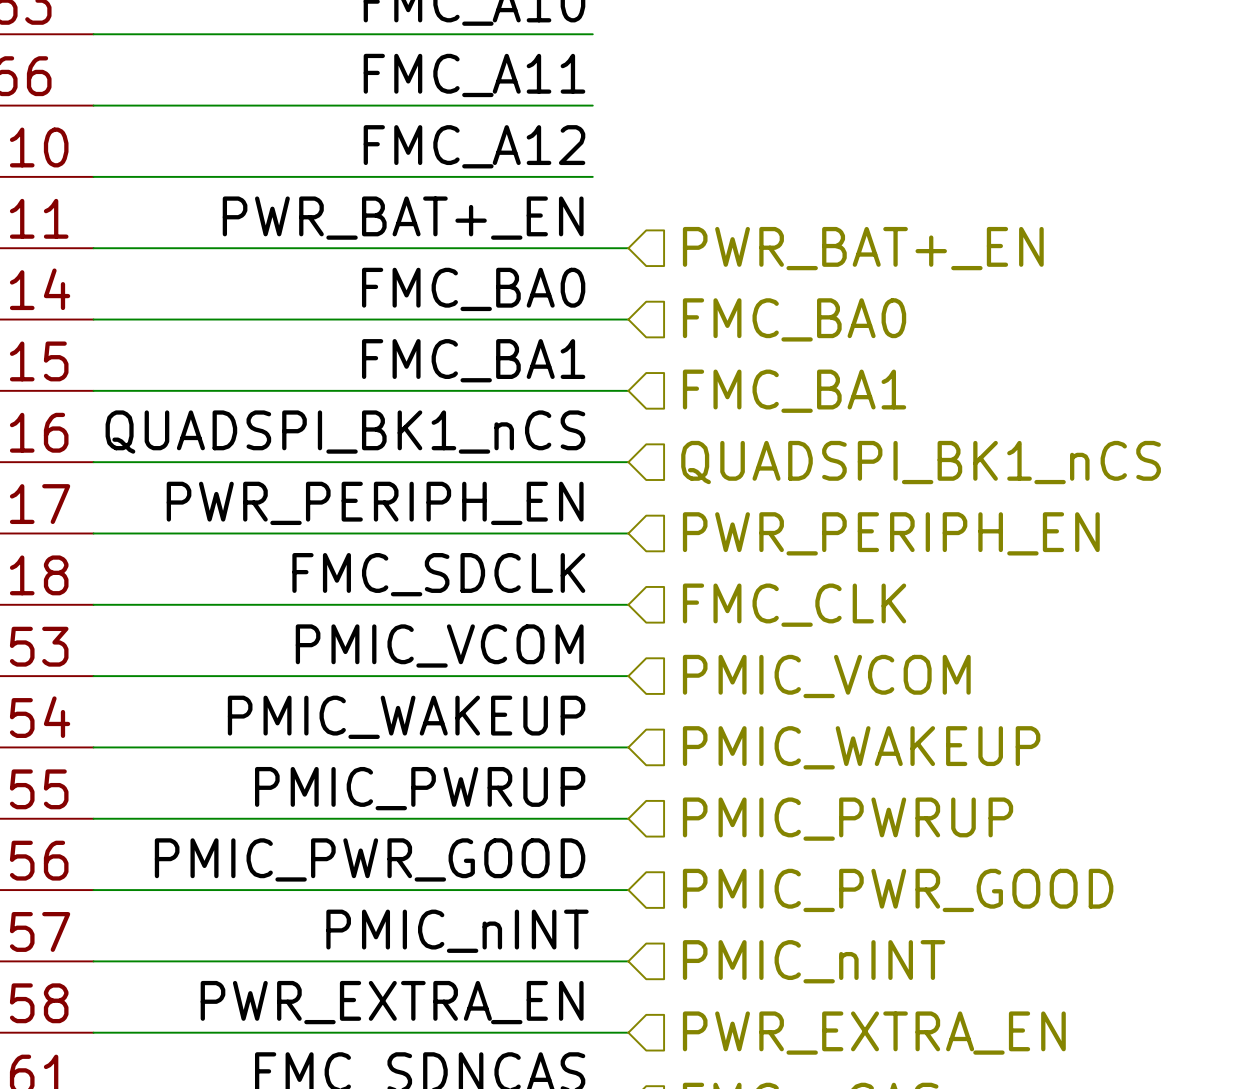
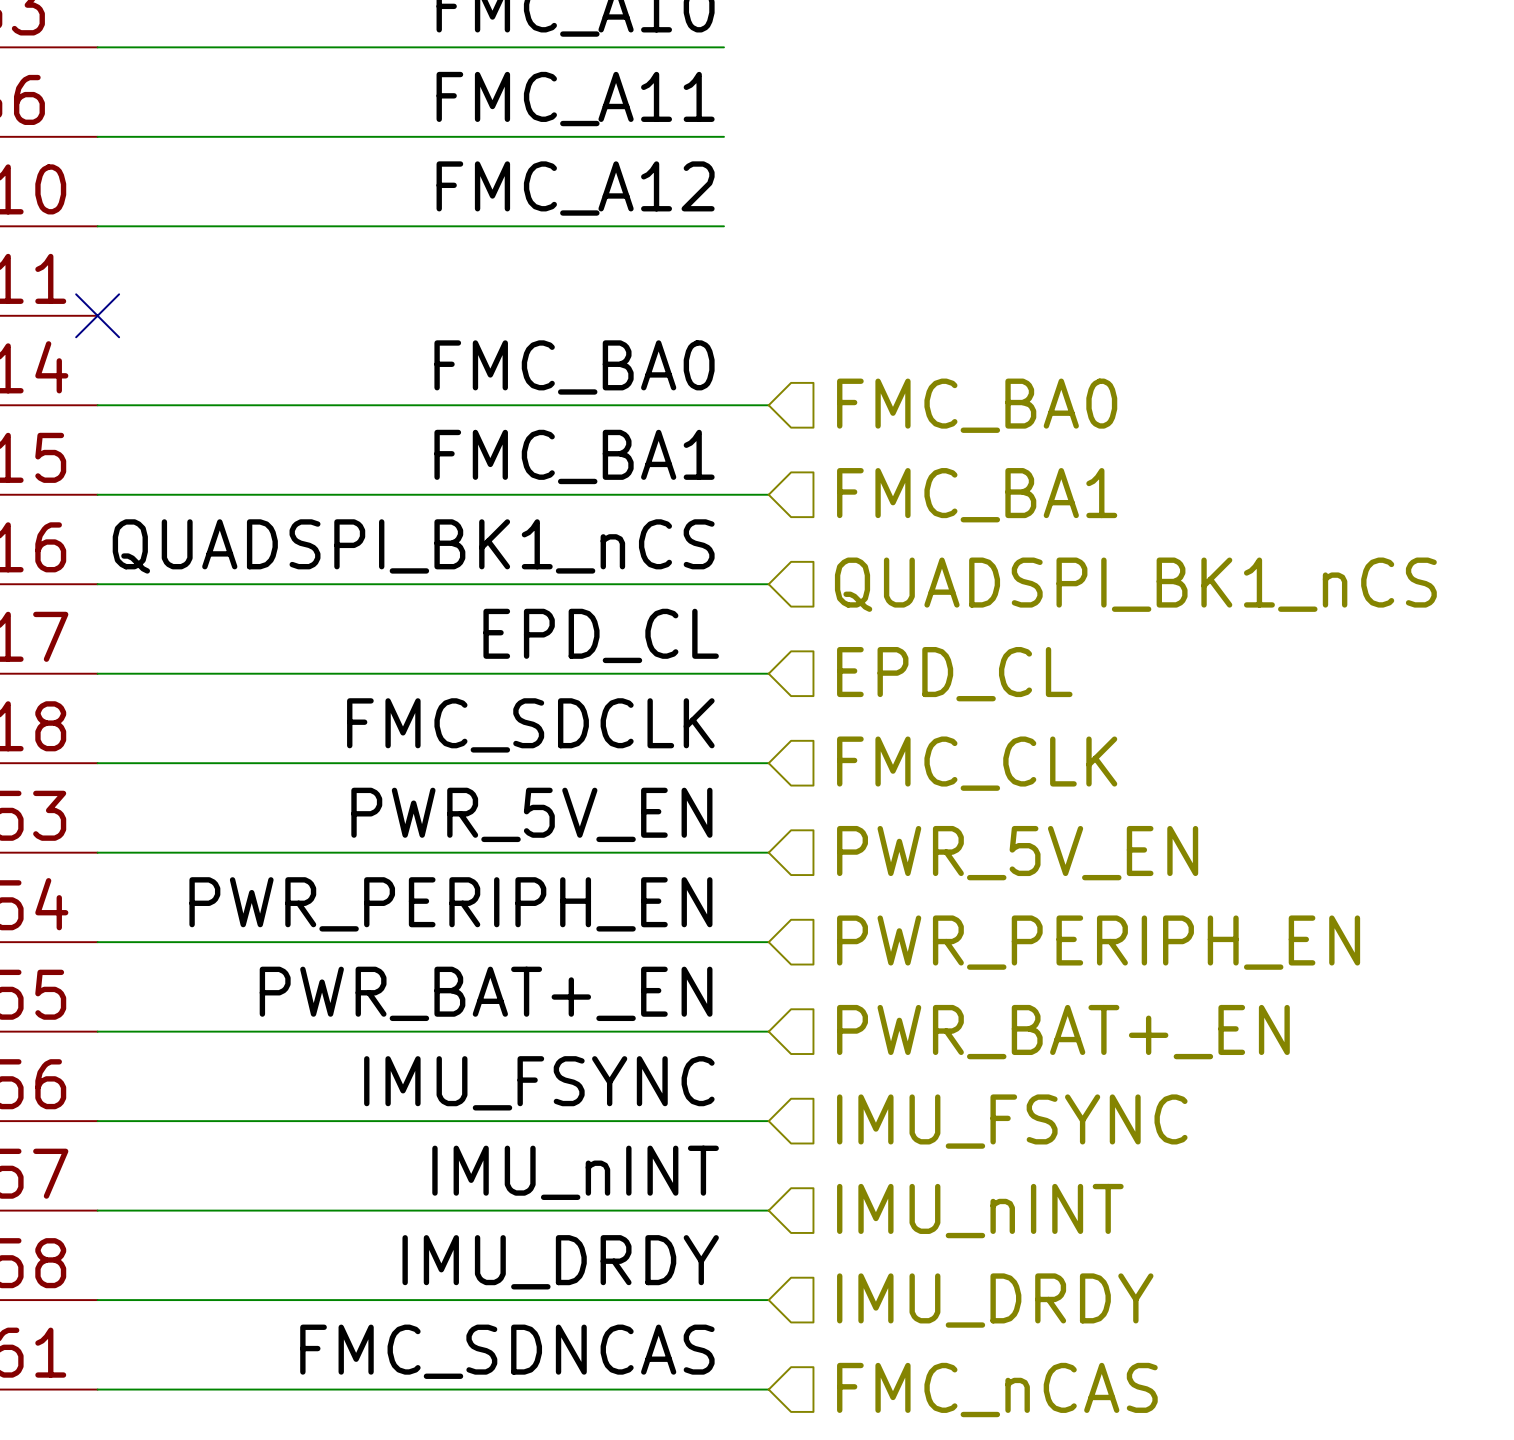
label: PWR_BAT+_EN (403, 218) -> none
wire: (93, 248) (628, 248) -> none
no-connect mark: none -> (97, 315)
hierarchical label: PWR_BAT+_EN (863, 248) -> none
label: PWR_PERIPH_EN (375, 503) -> EPD_CL (601, 635)
hierarchical label: PWR_PERIPH_EN (891, 533) -> EPD_CL (954, 674)
label: PMIC_VCOM (439, 645) -> PWR_5V_EN (531, 814)
hierarchical label: PMIC_VCOM (826, 676) -> PWR_5V_EN (1017, 853)
label: PMIC_WAKEUP (406, 717) -> PWR_PERIPH_EN (450, 904)
hierarchical label: PMIC_WAKEUP (861, 747) -> PWR_PERIPH_EN (1098, 942)
label: PMIC_PWRUP (420, 788) -> PWR_BAT+_EN (486, 993)
hierarchical label: PMIC_PWRUP (848, 819) -> PWR_BAT+_EN (1063, 1032)
label: PMIC_PWR_GOOD (370, 859) -> IMU_FSYNC (539, 1083)
hierarchical label: PMIC_PWR_GOOD (898, 890) -> IMU_FSYNC (1012, 1121)
label: PMIC_nINT (457, 931) -> IMU_nINT (575, 1172)
hierarchical label: PMIC_nINT (814, 961) -> IMU_nINT (980, 1211)
label: PWR_EXTRA_EN (392, 1002) -> IMU_DRDY (560, 1262)
hierarchical label: PWR_EXTRA_EN (874, 1033) -> IMU_DRDY (995, 1300)

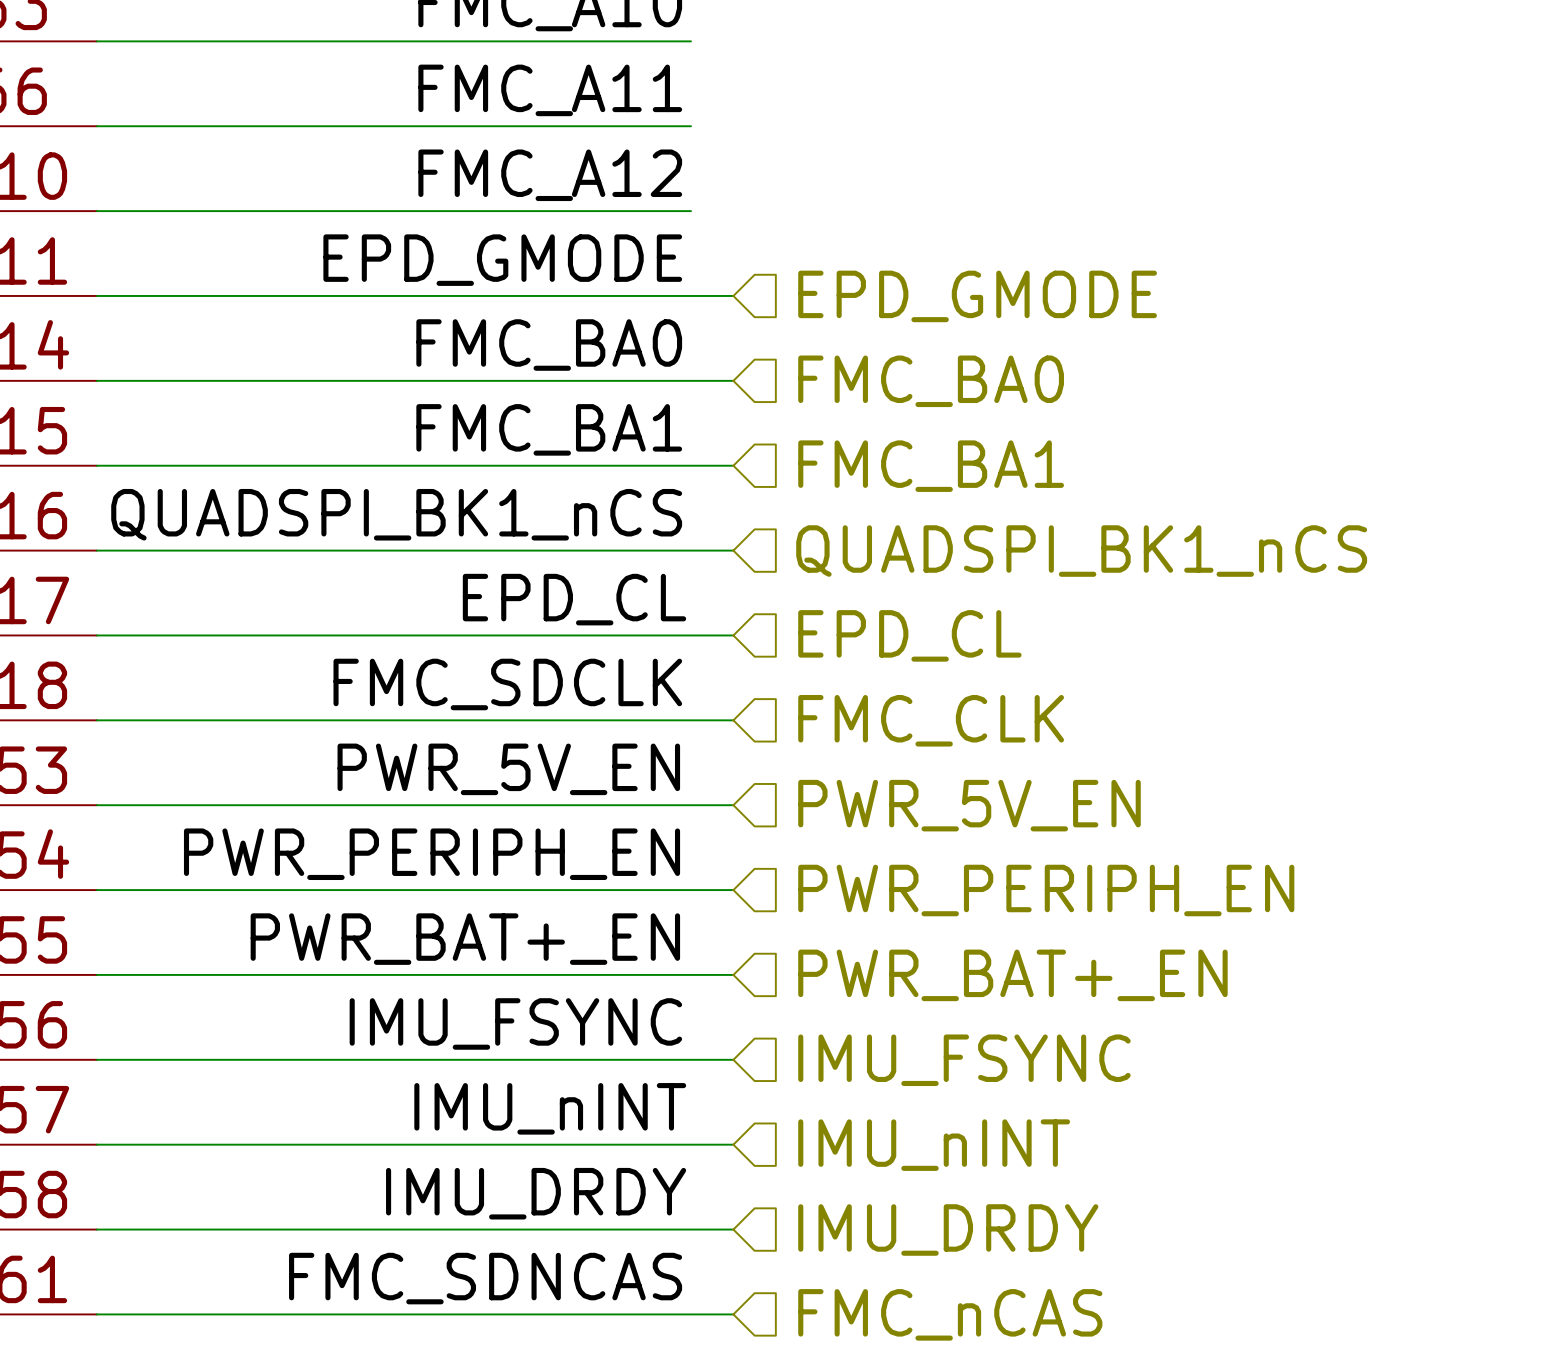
label: none -> EPD_GMODE (502, 260)
wire: none -> (96, 295) (733, 295)
no-connect mark: (97, 315) -> none
hierarchical label: none -> EPD_GMODE (977, 296)

